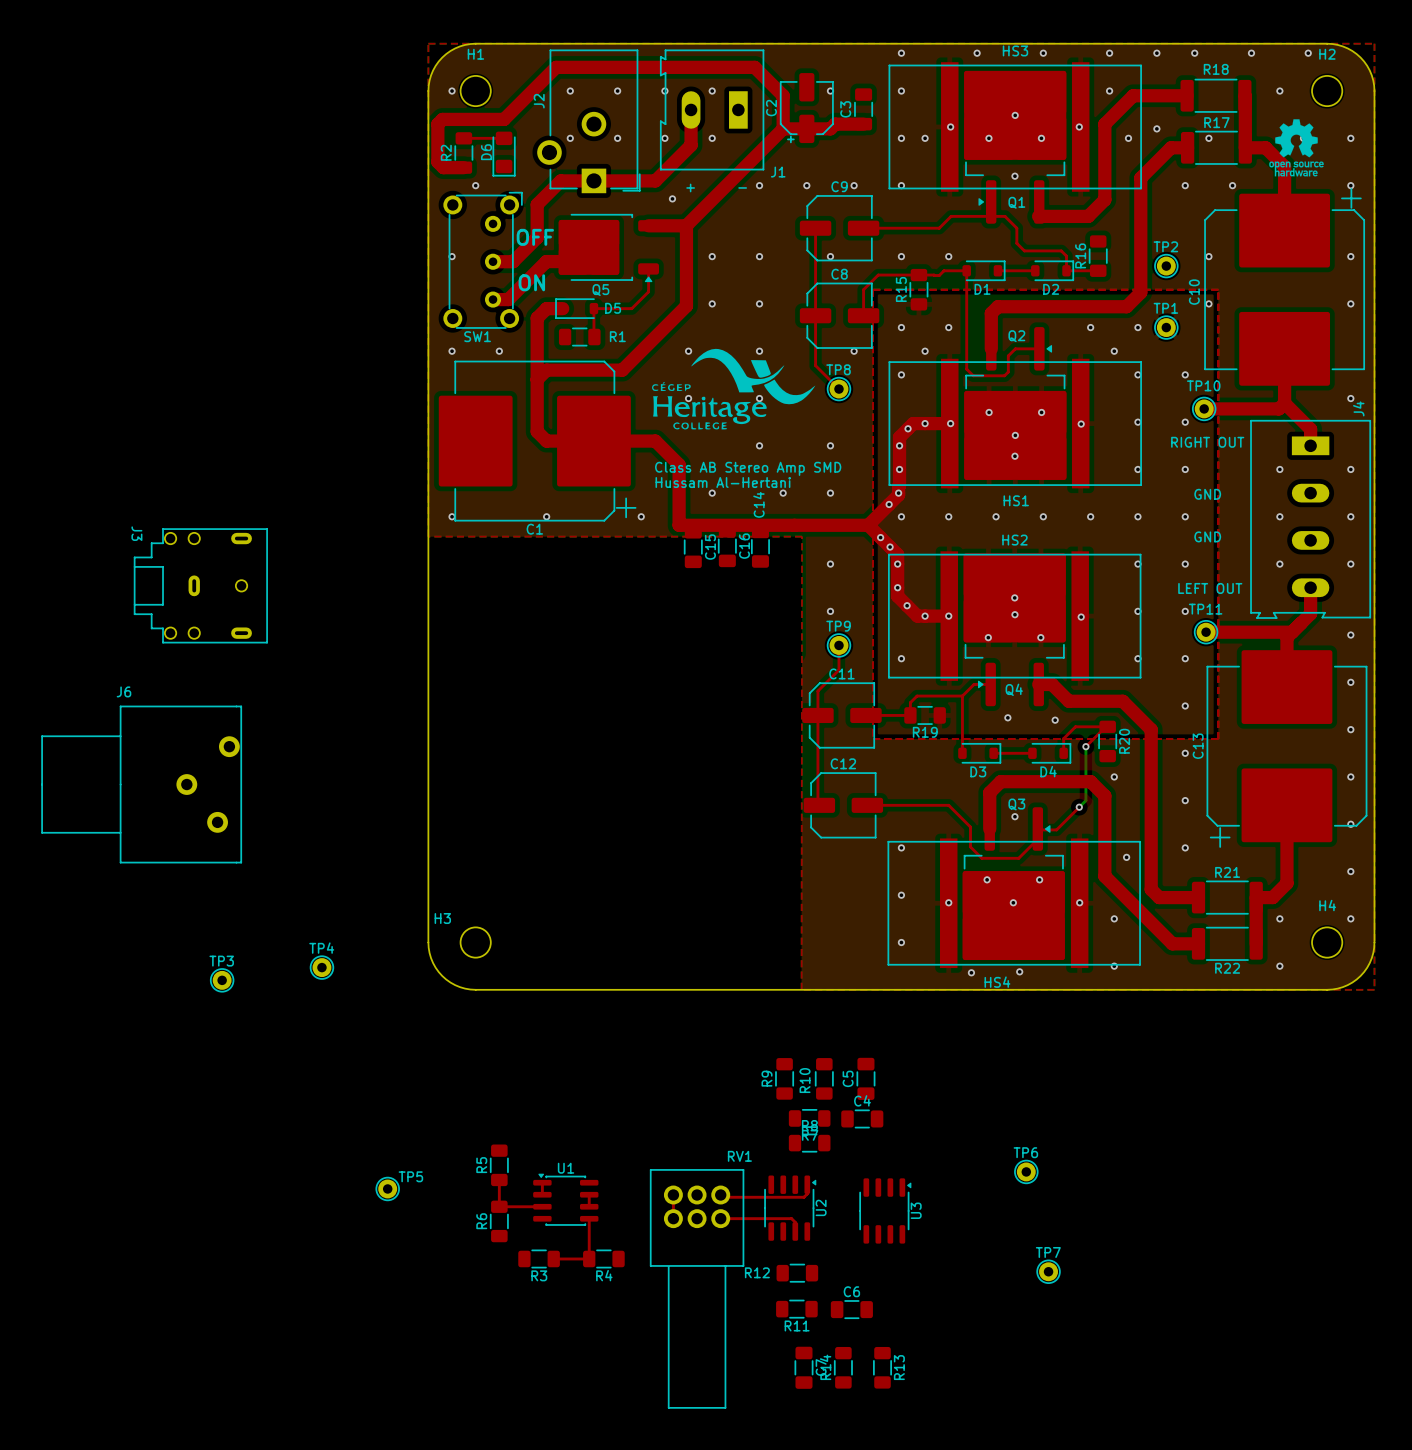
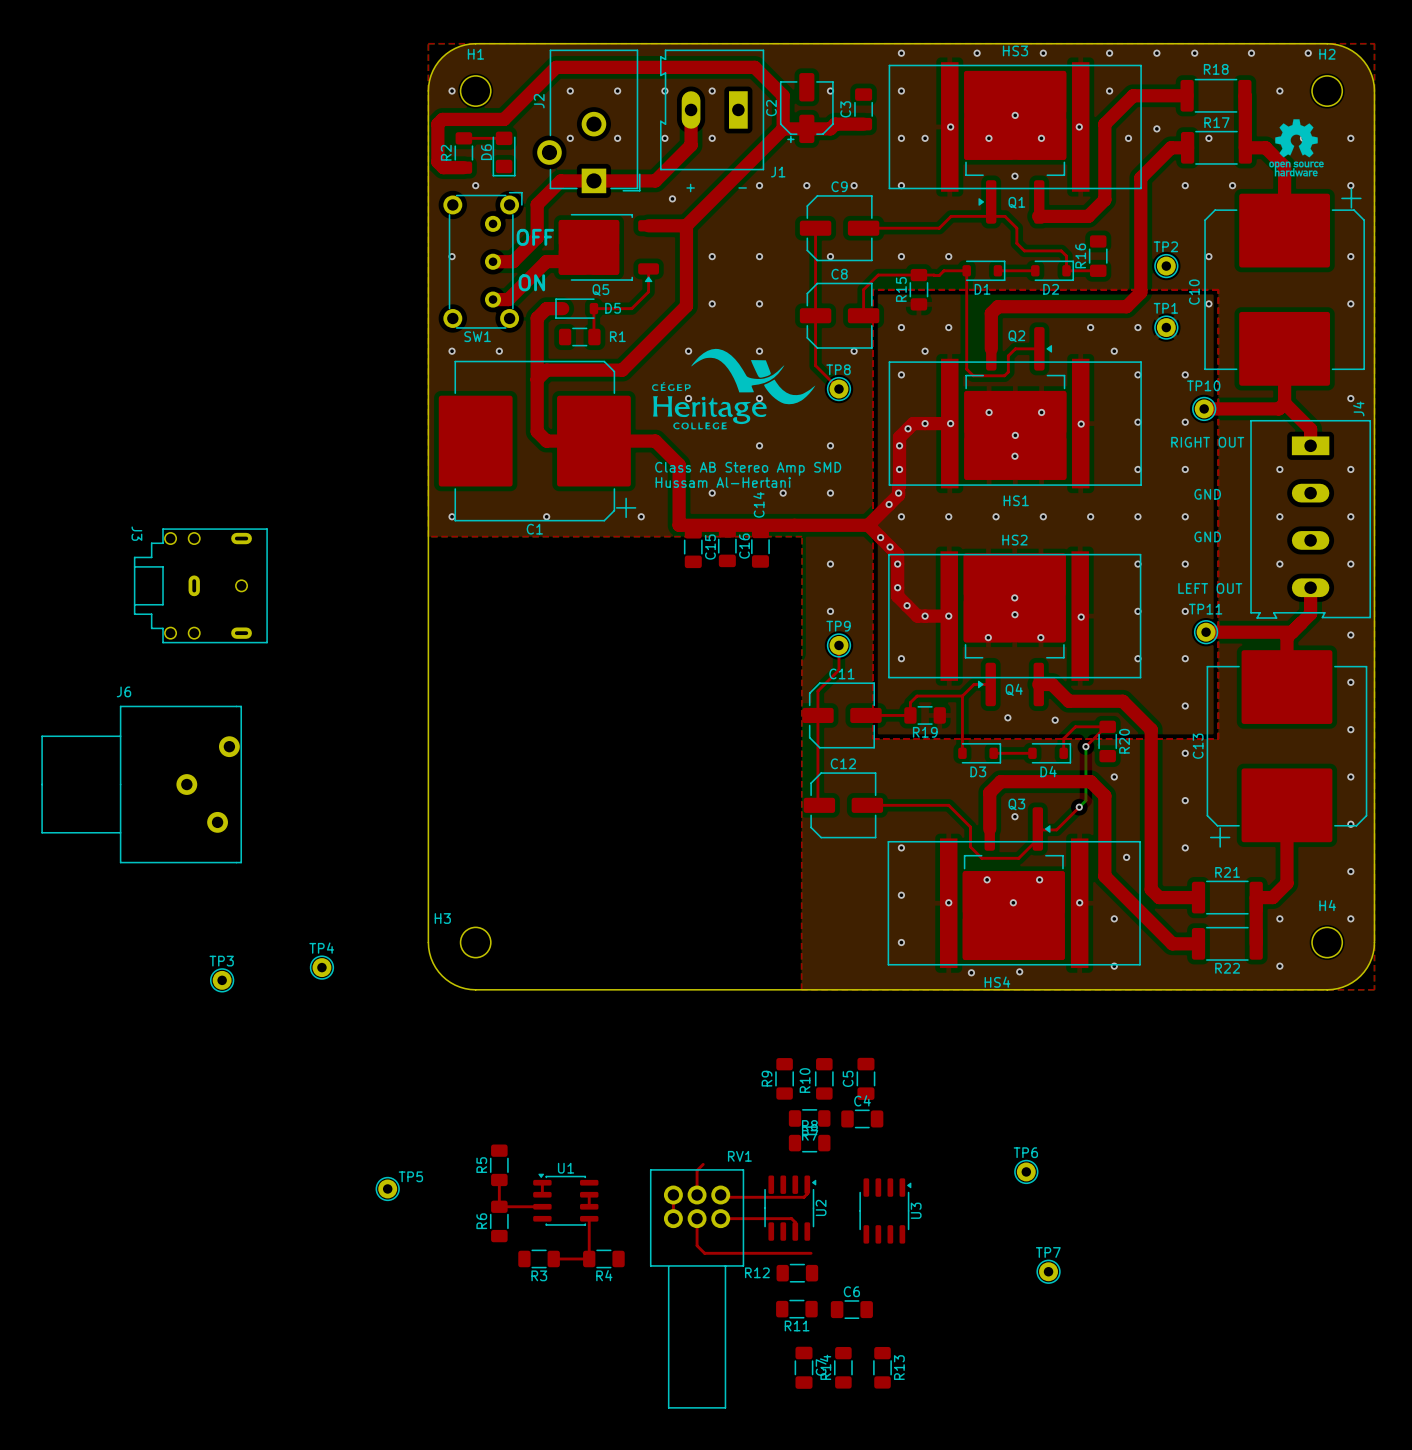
top track: none -> (703, 1164) (697, 1170) (697, 1195)
top track: none -> (697, 1218) (697, 1245) (704, 1253) (811, 1253)

